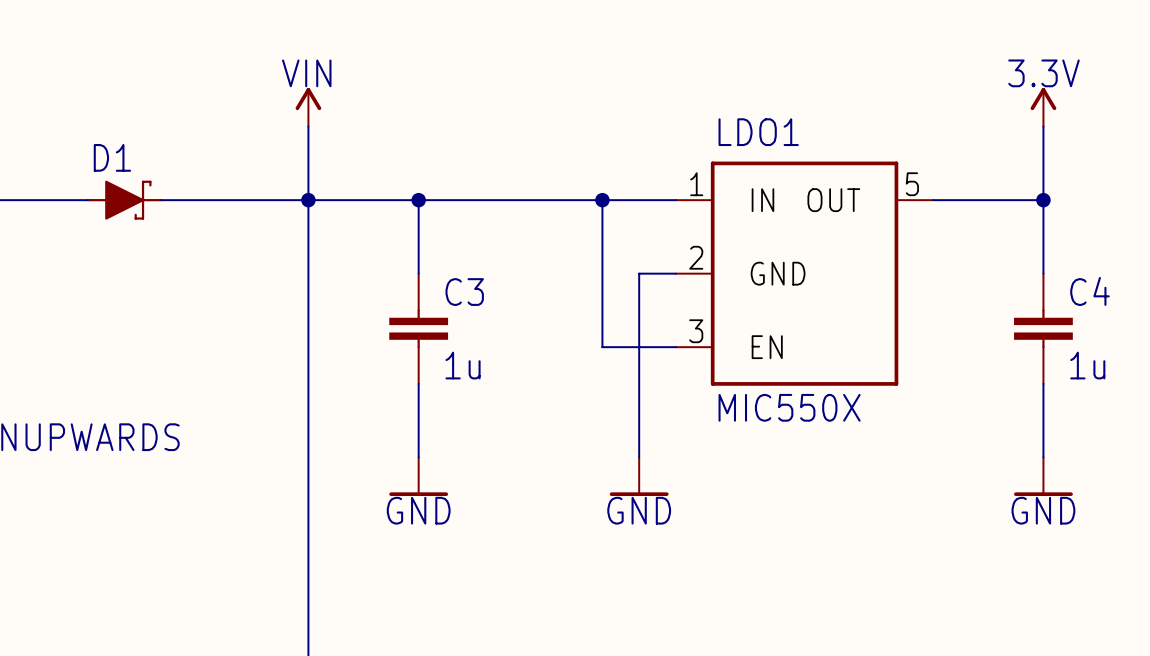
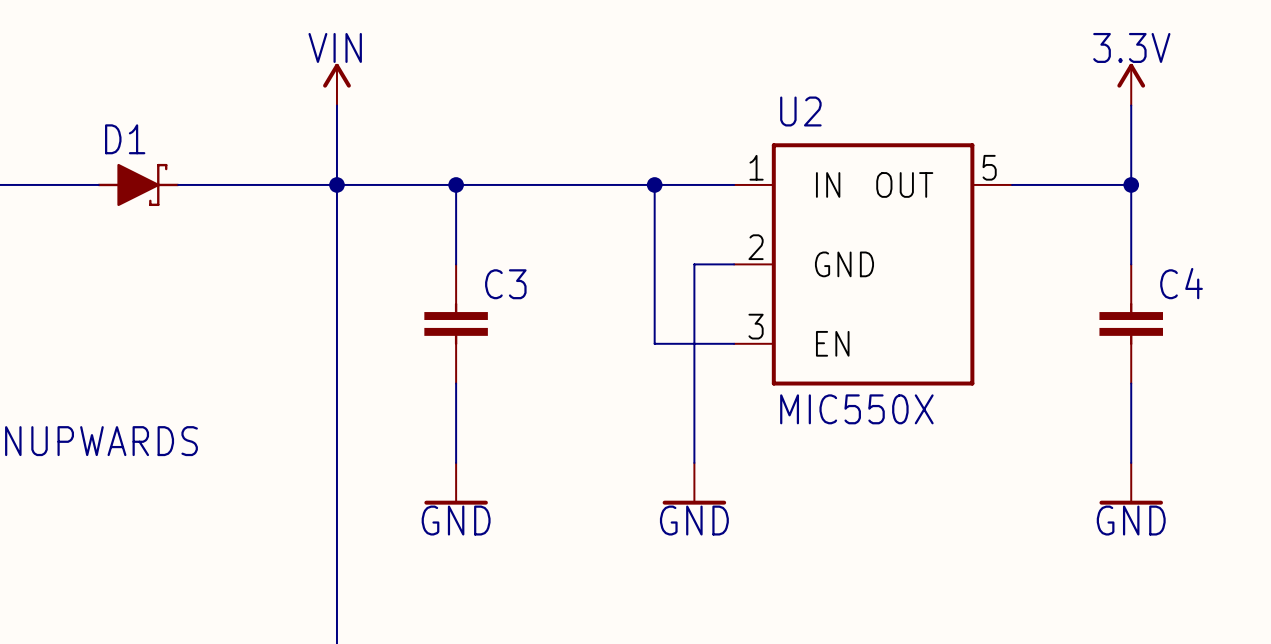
LDO1 name: LDO1 (758, 132) -> U2 (800, 111)
C3 value: 1u (463, 365) -> none
C4 value: 1u (1087, 365) -> none

